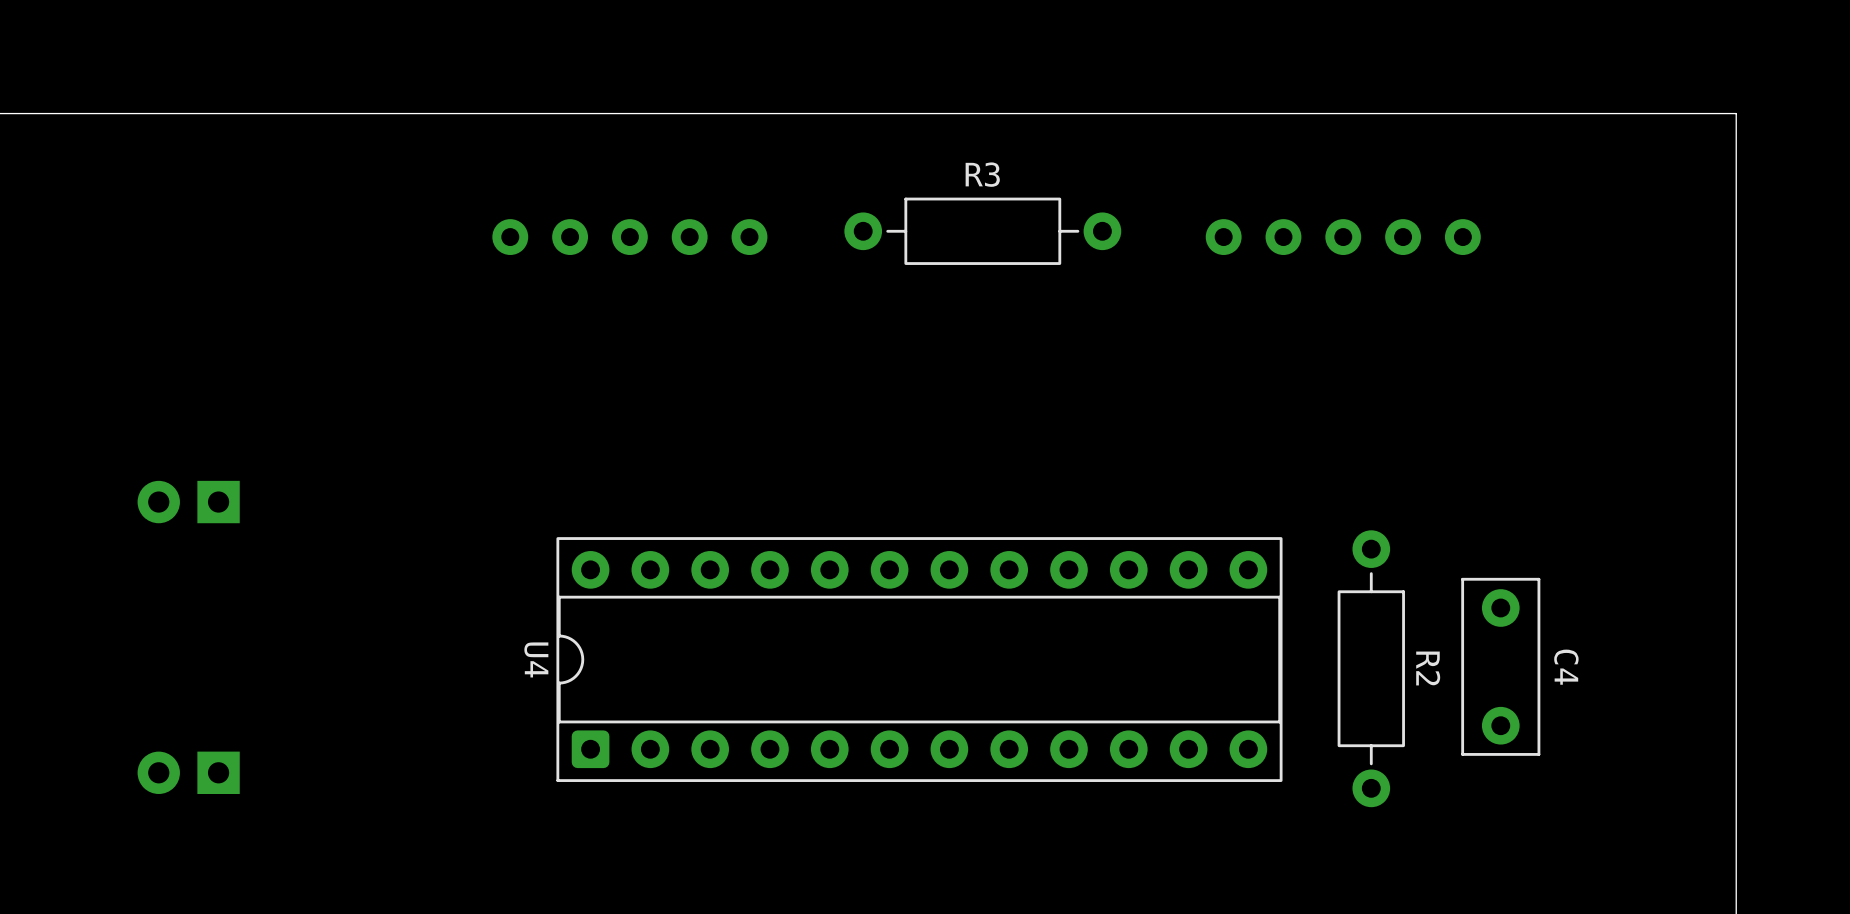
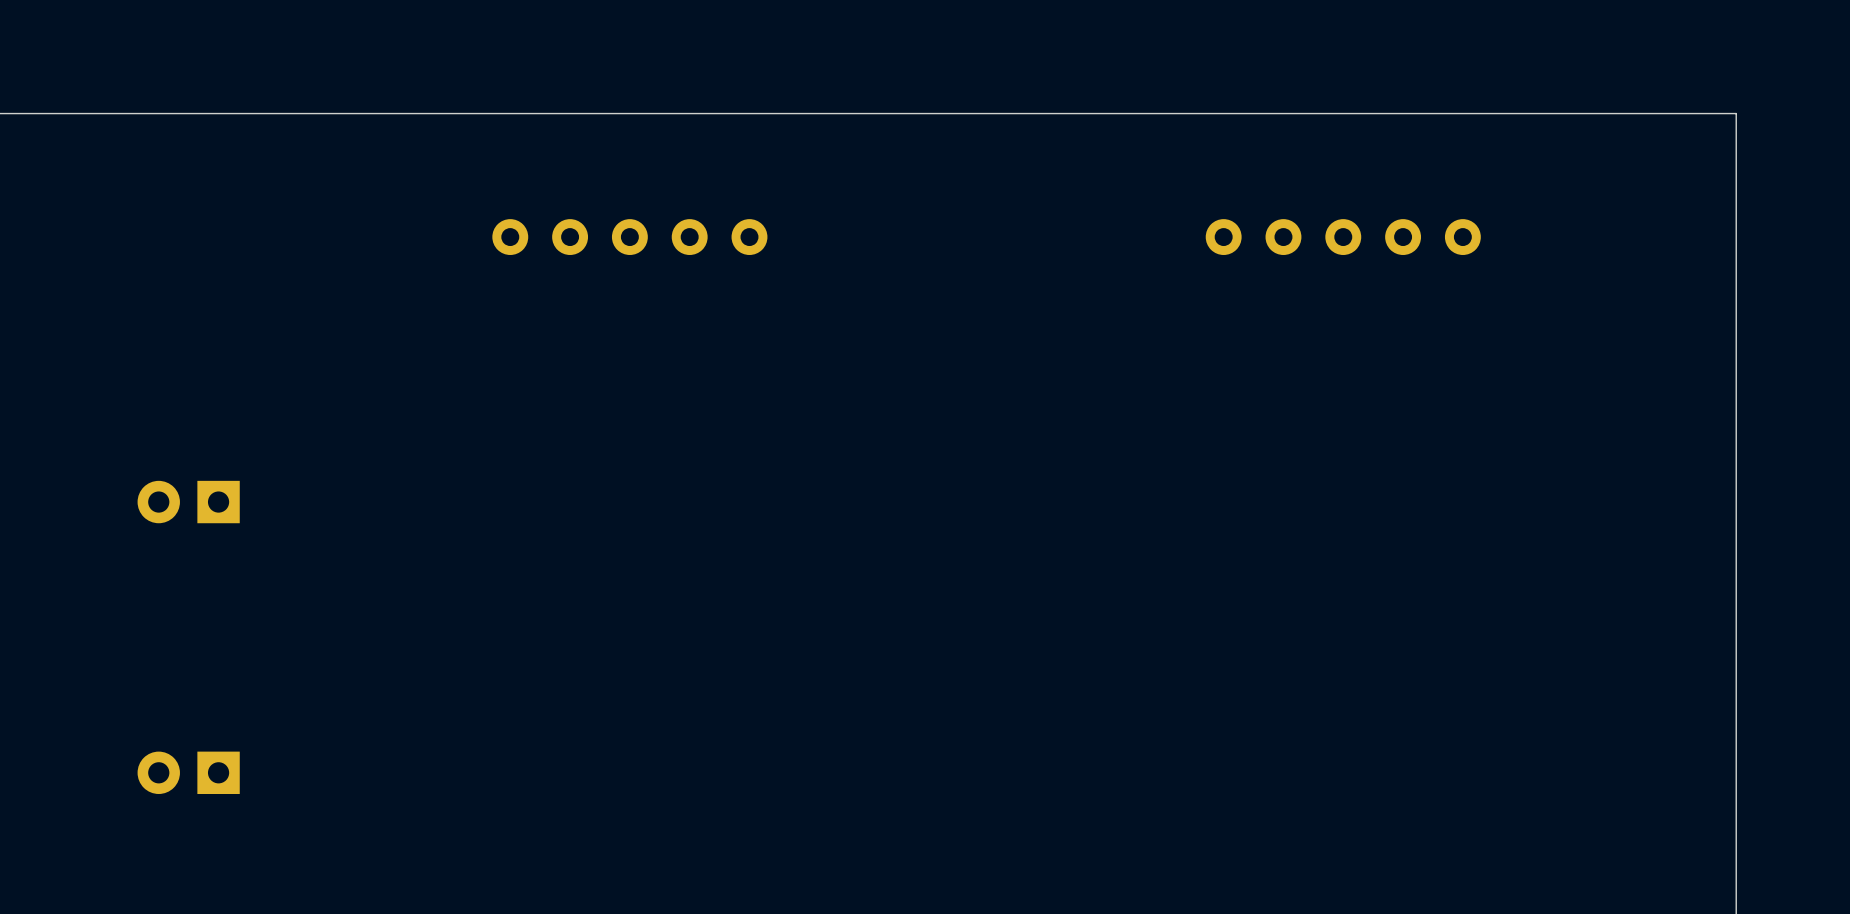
R3: (982, 231) -> none
U4: (919, 659) -> none
C4: (1500, 666) -> none
R2: (1371, 668) -> none

